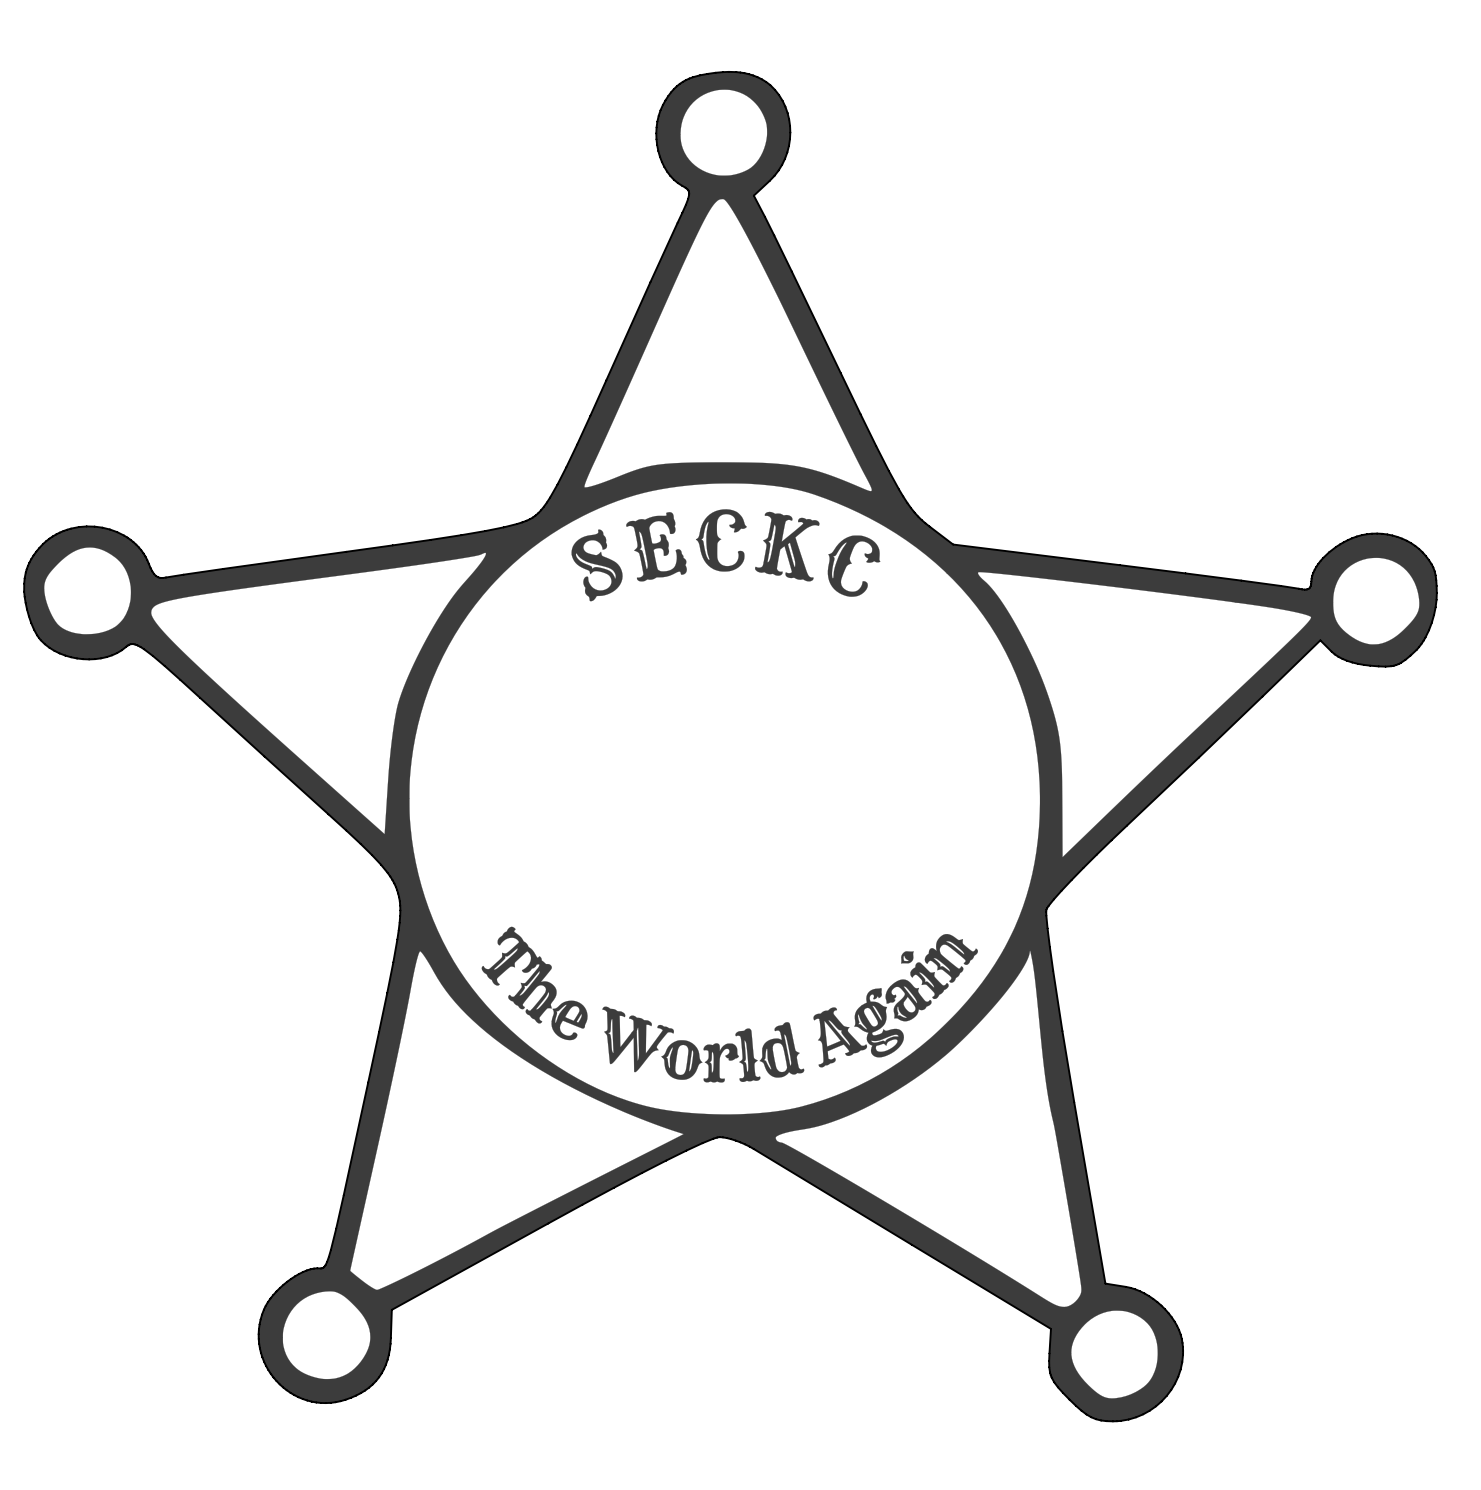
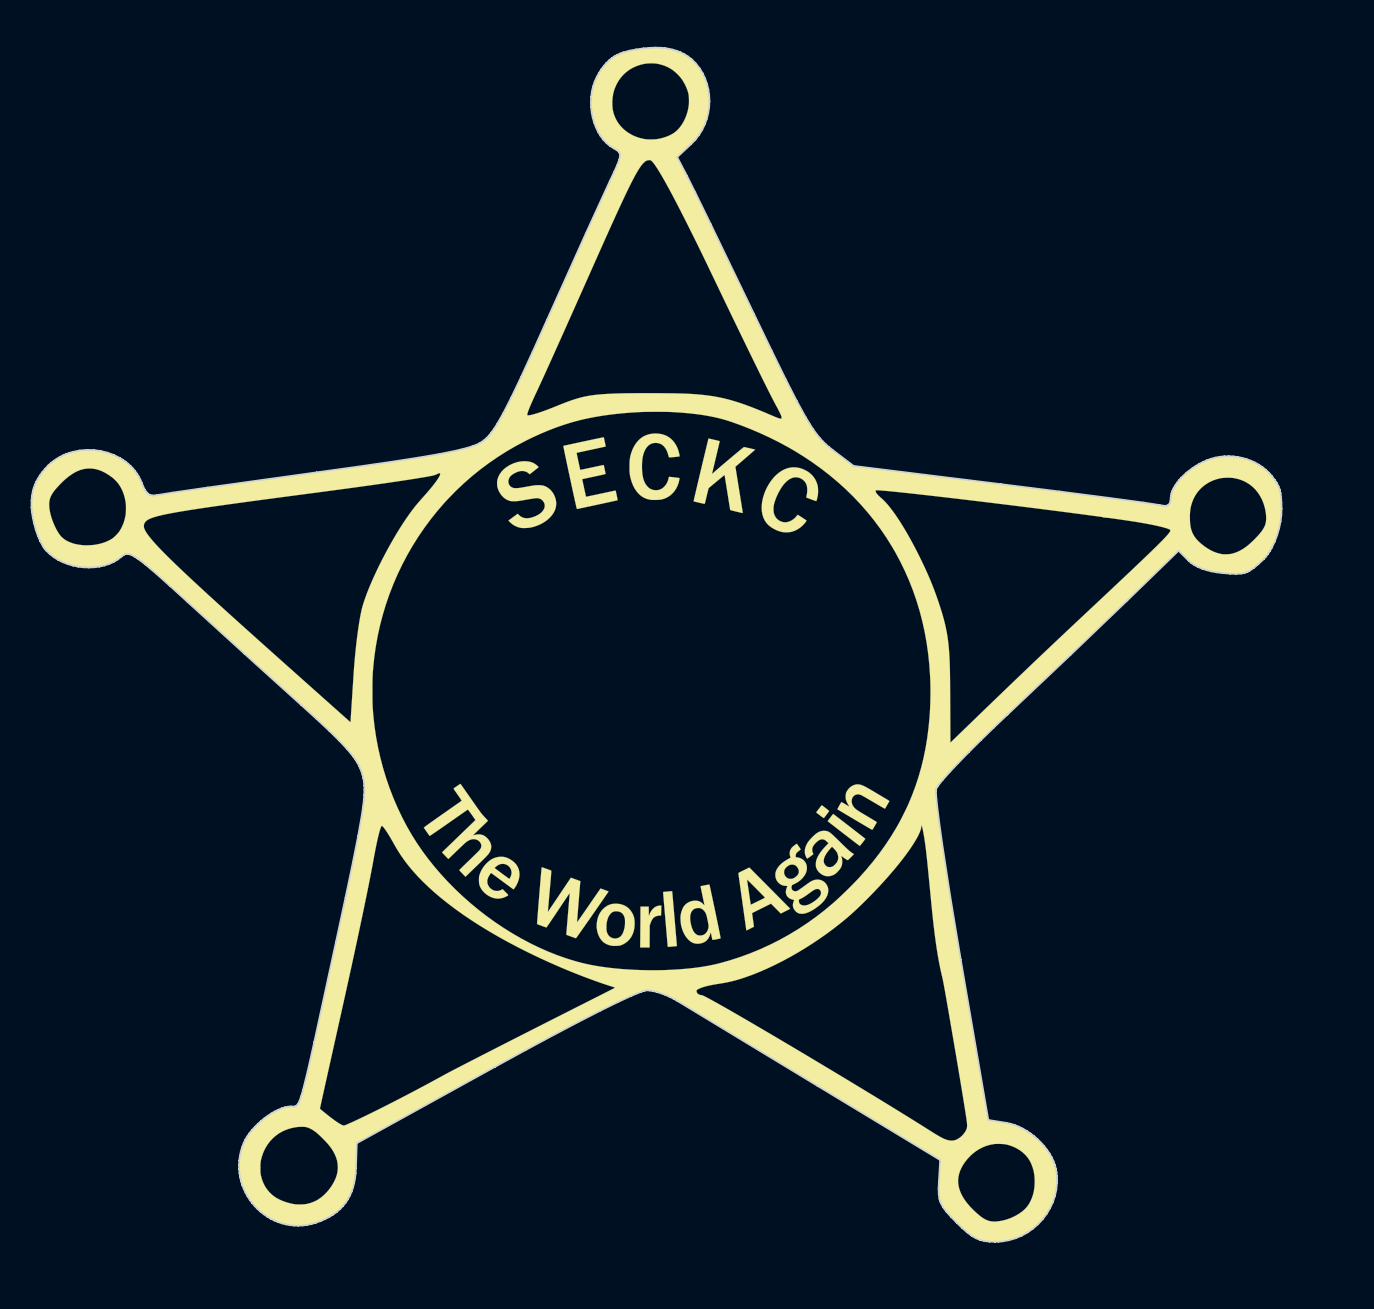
drawing shape: [24, 71, 1437, 1422] -> [31, 47, 1282, 1242]

